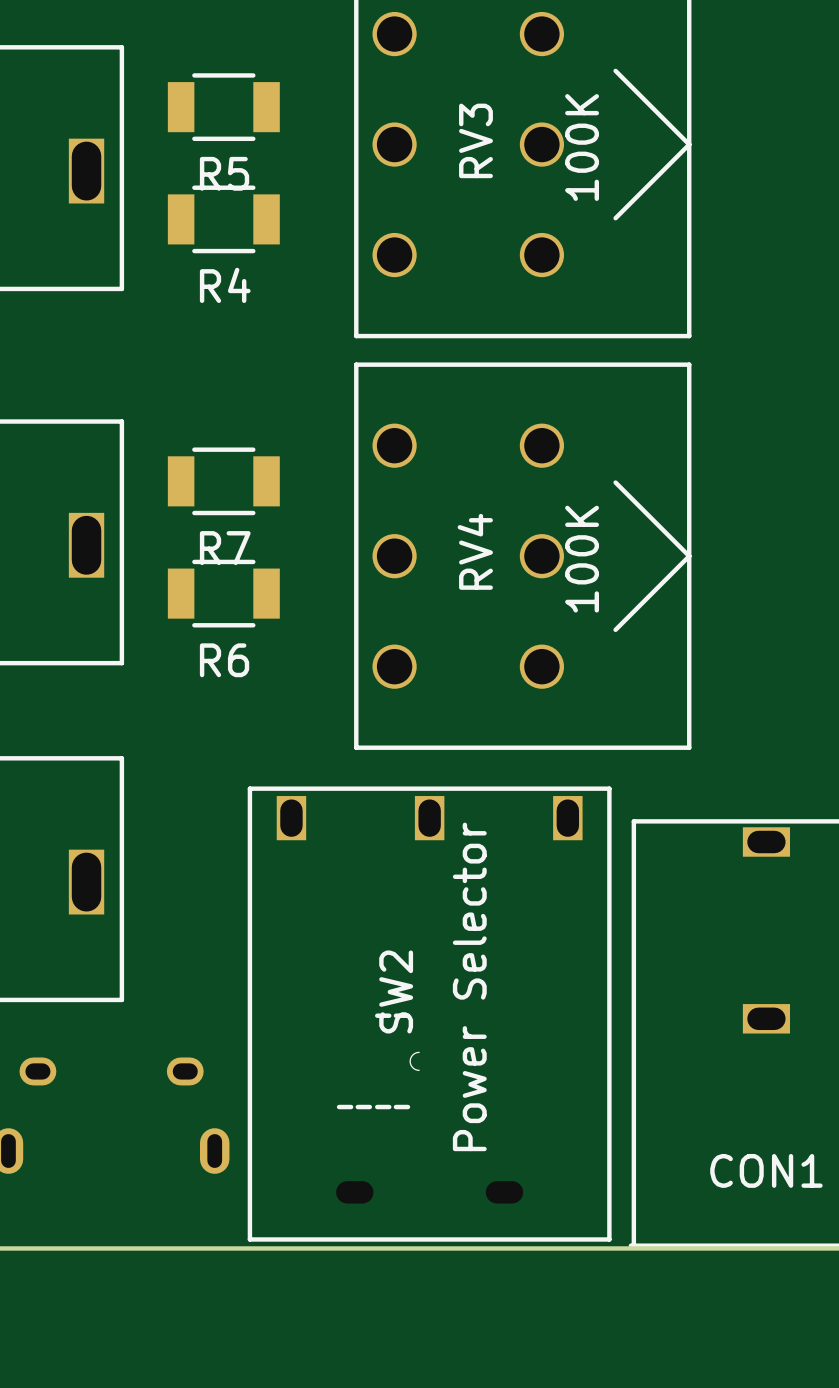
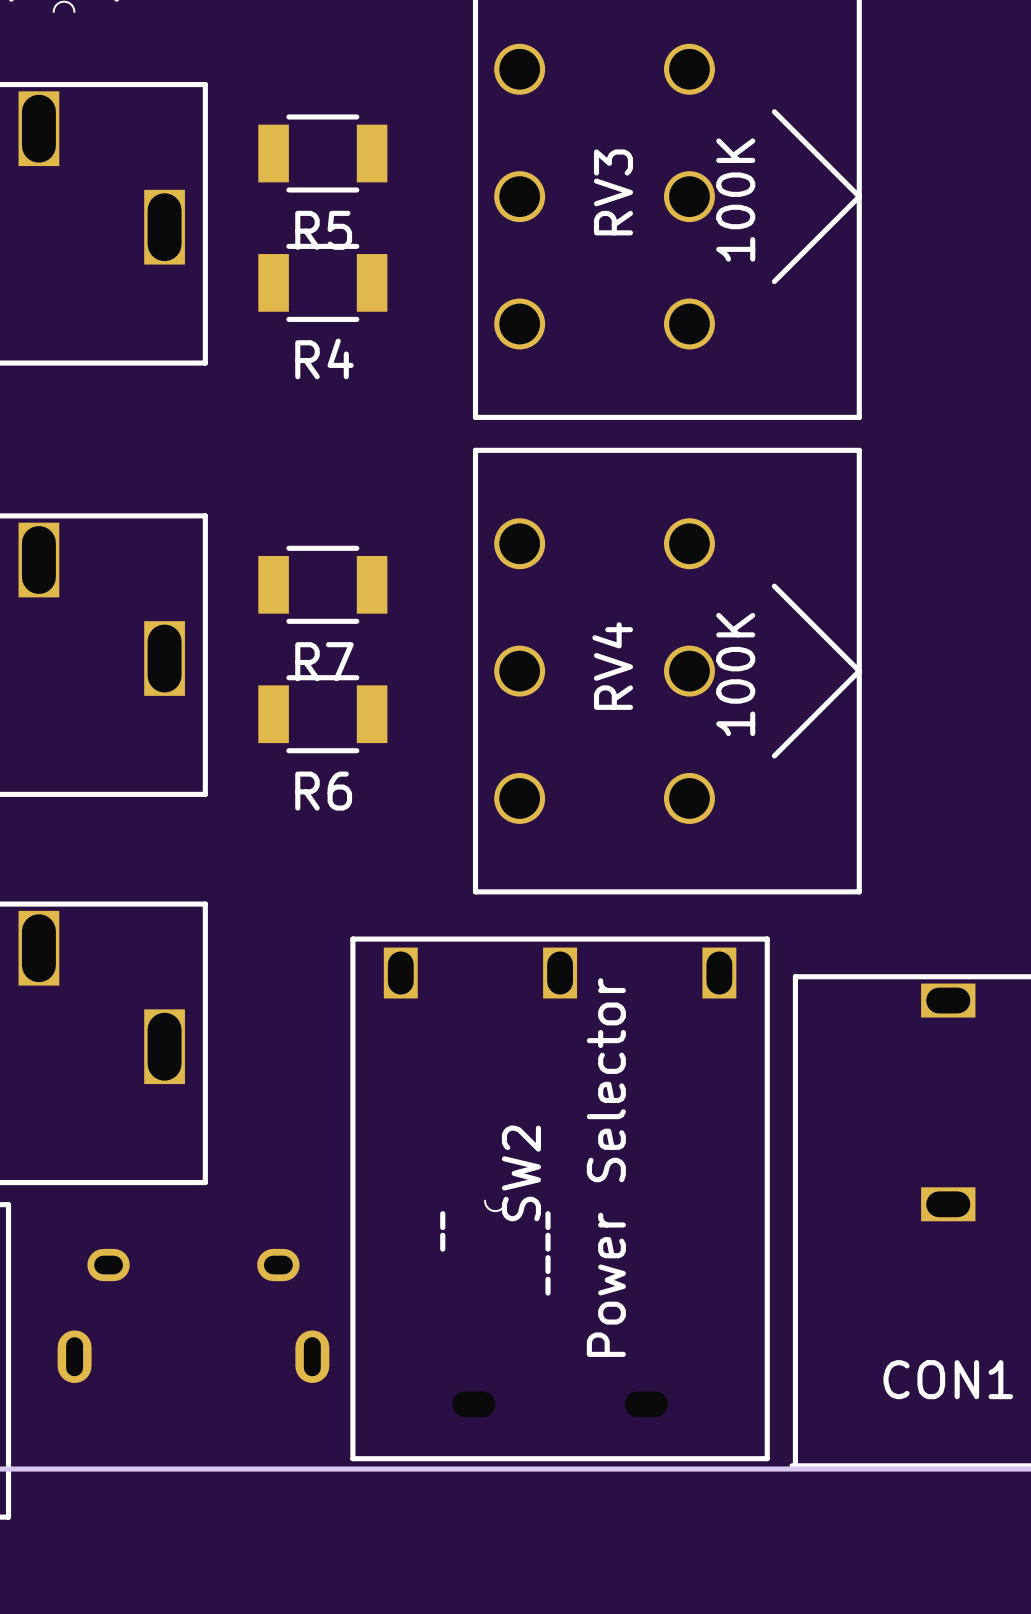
part rotation: 0° (378, 1061) -> 90° counterclockwise (495, 1248)

